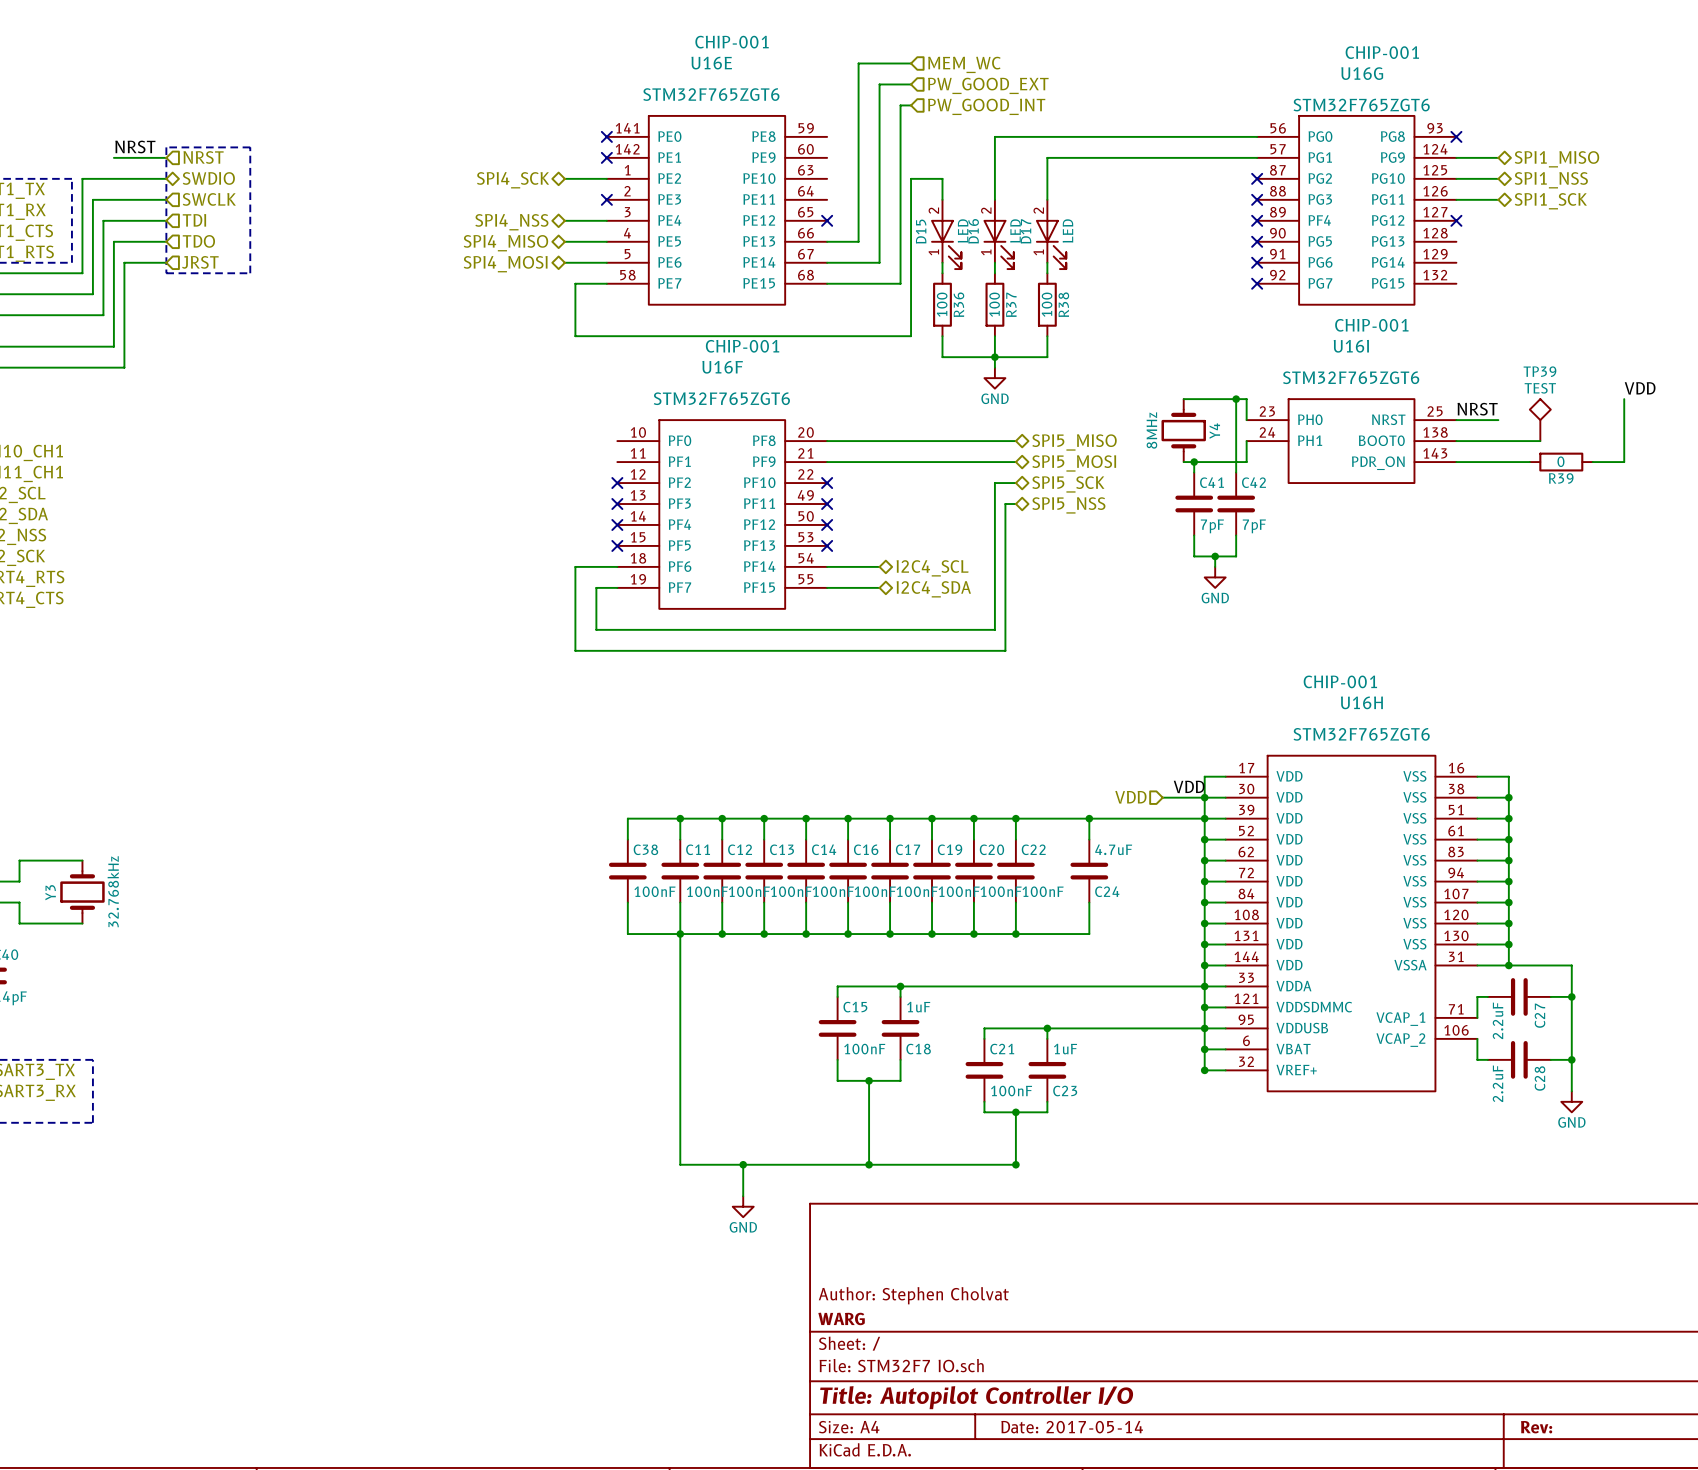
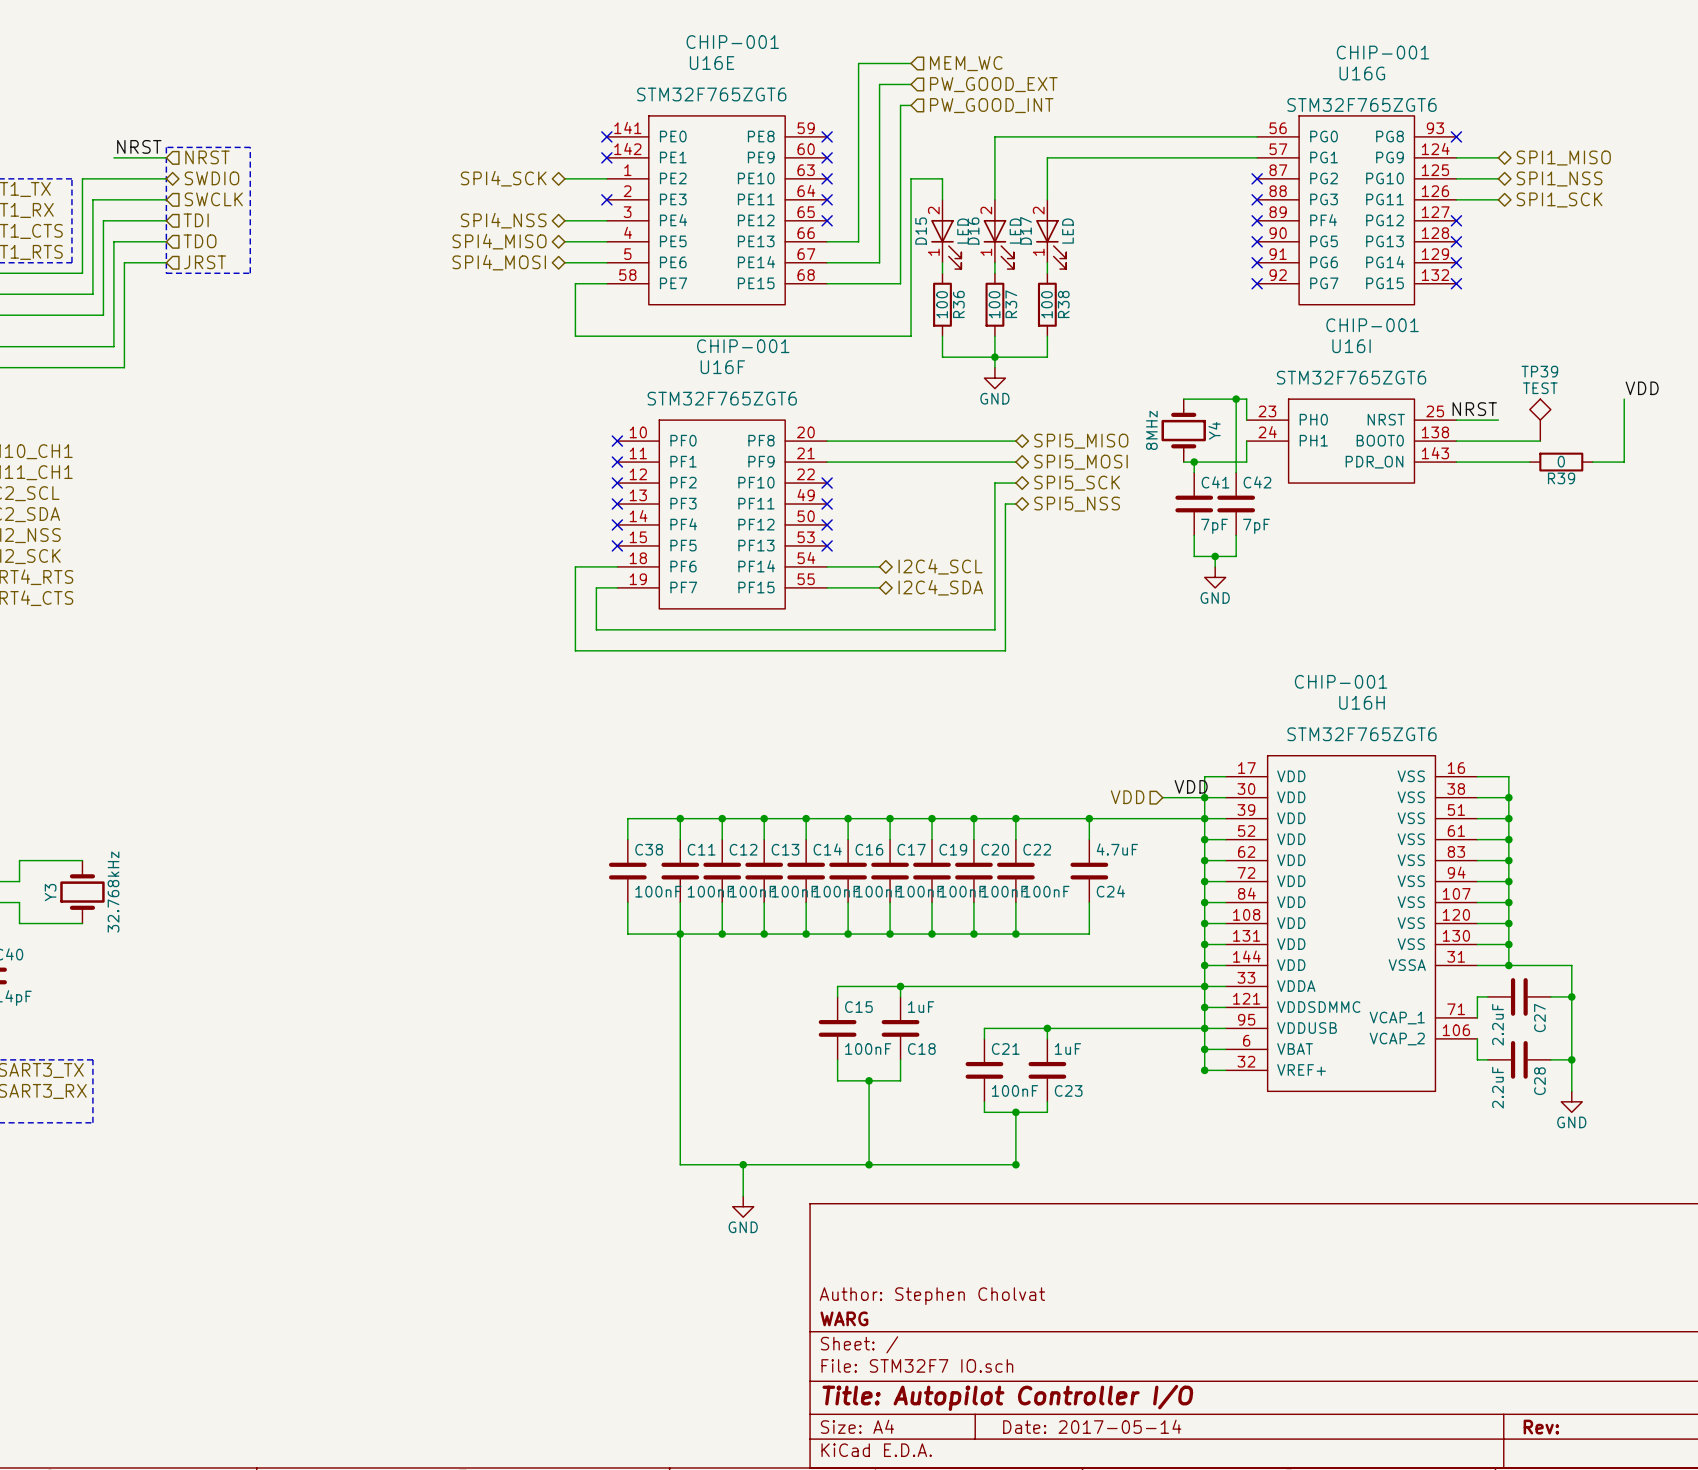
no-connect mark: none -> (827, 136)
no-connect mark: none -> (827, 157)
no-connect mark: none -> (827, 178)
no-connect mark: none -> (827, 199)
no-connect mark: none -> (1456, 241)
no-connect mark: none -> (1456, 262)
no-connect mark: none -> (1456, 283)
no-connect mark: none -> (617, 441)
no-connect mark: none -> (617, 462)

